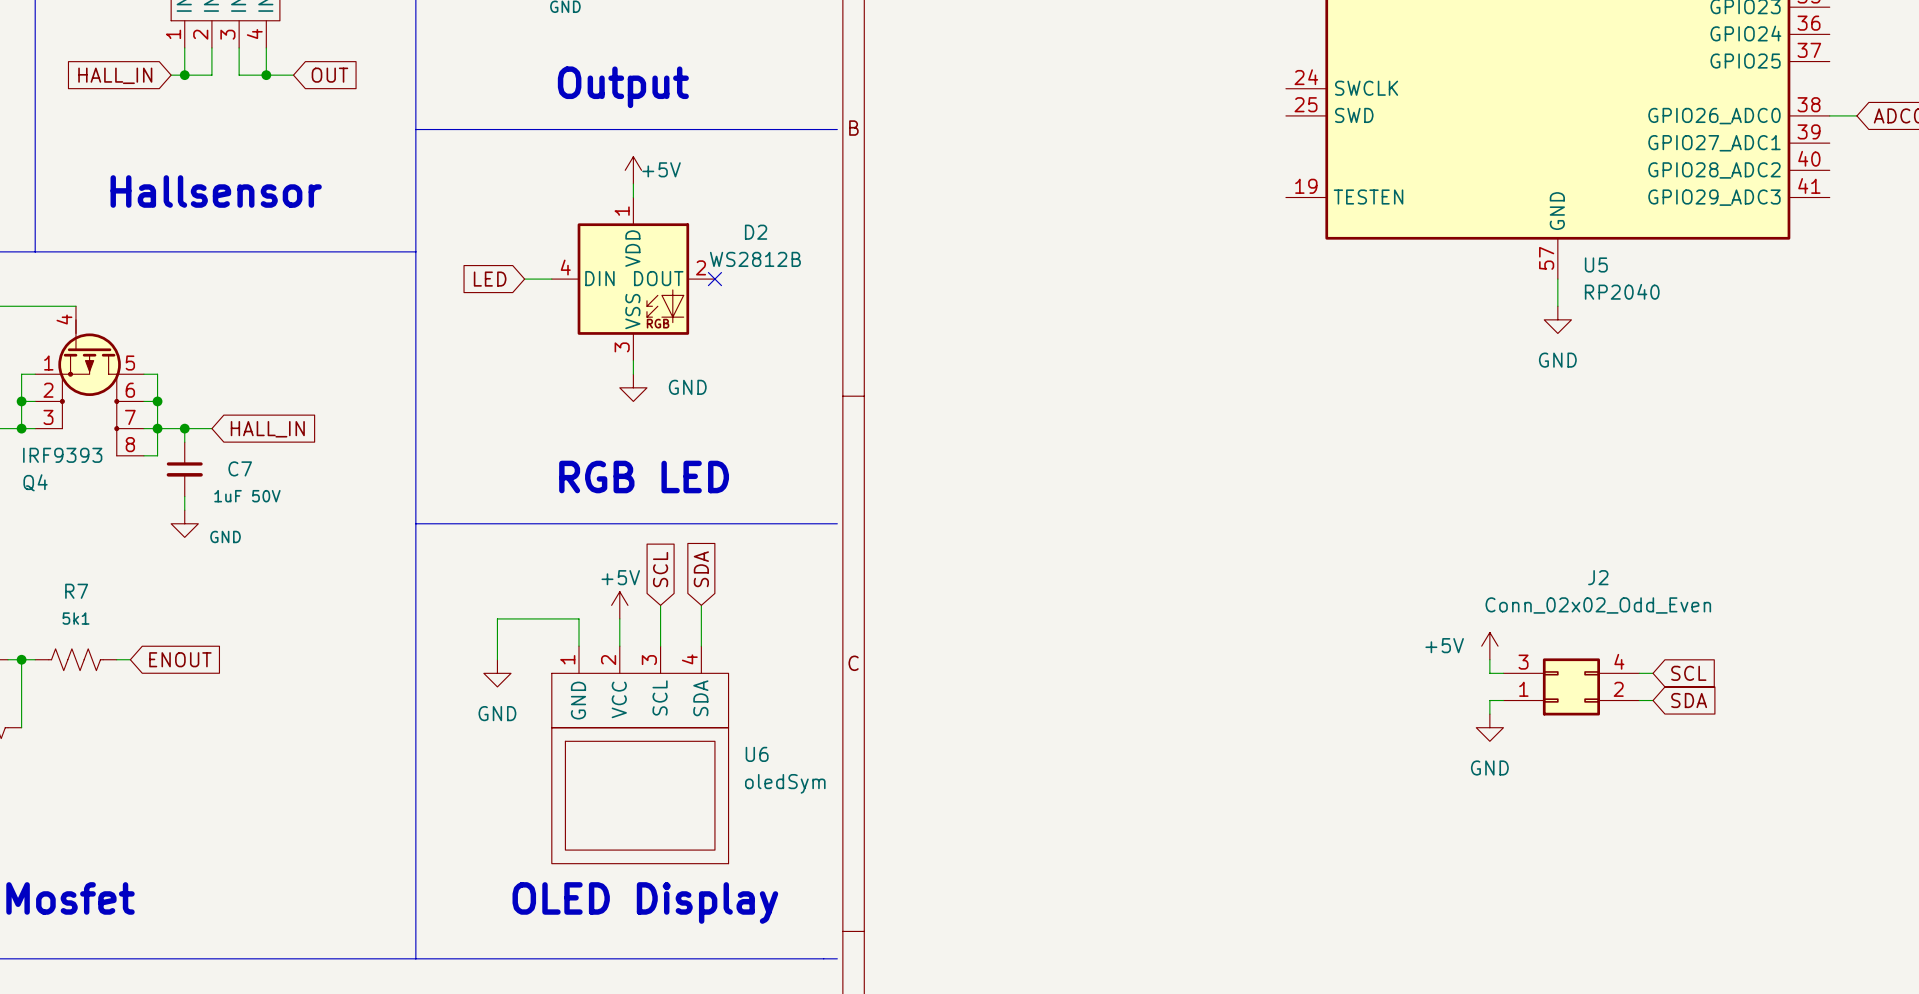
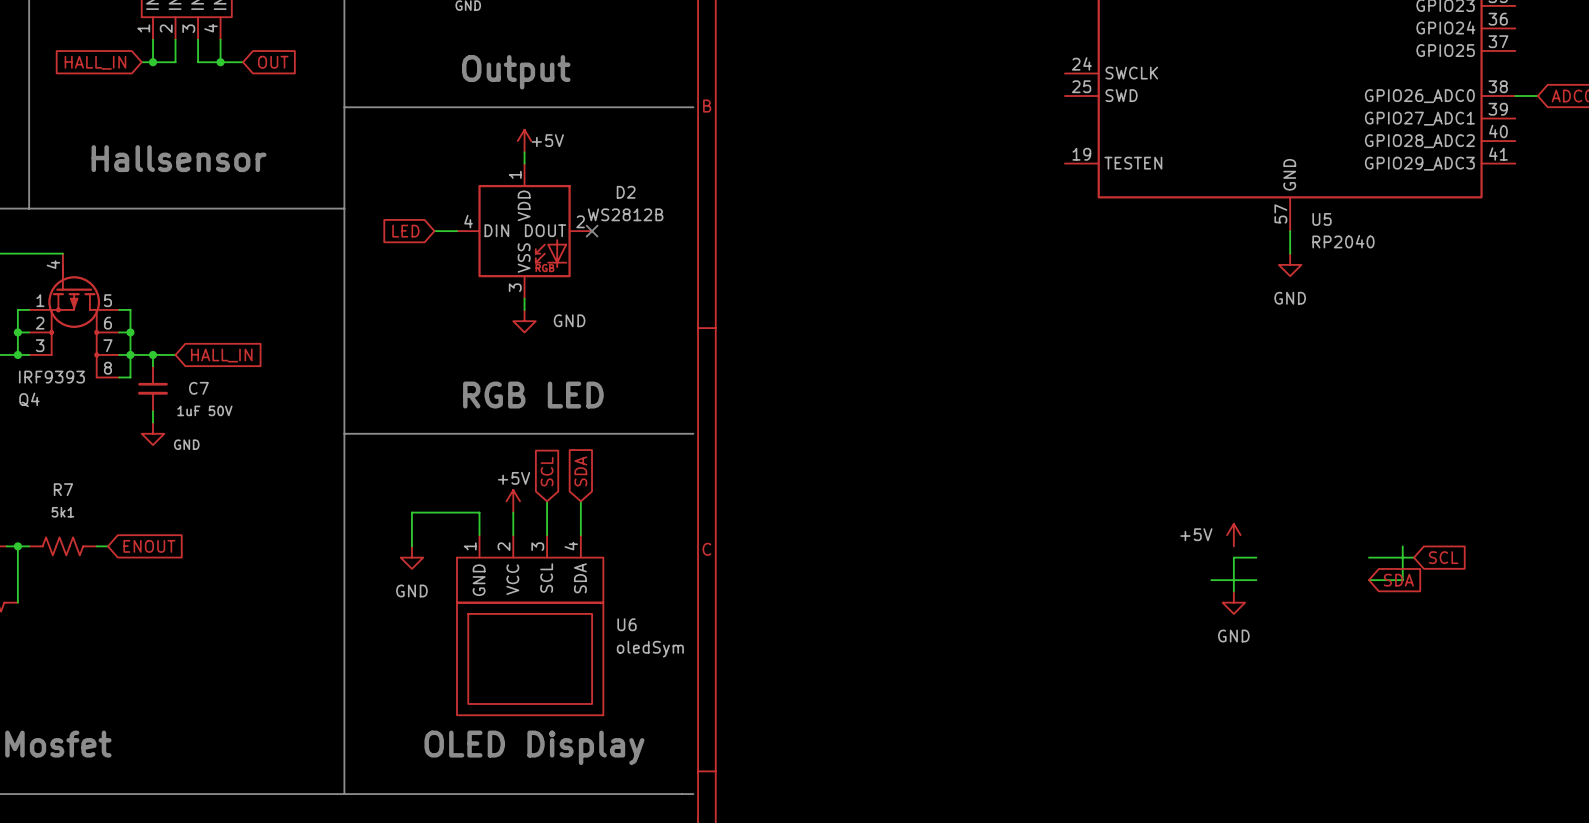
wire: (1489, 659) (1489, 673) -> (1211, 580) (1233, 580) (1233, 557)
wire: (1639, 673) (1653, 673) -> (1414, 557) (1368, 557)
global label position: SCL (1688, 673) -> SCL (1443, 557)
J2: Conn_02x02_Odd_Even (1571, 686) -> none
wire: (1639, 700) (1653, 700) -> (1402, 546) (1402, 580) (1368, 580)

